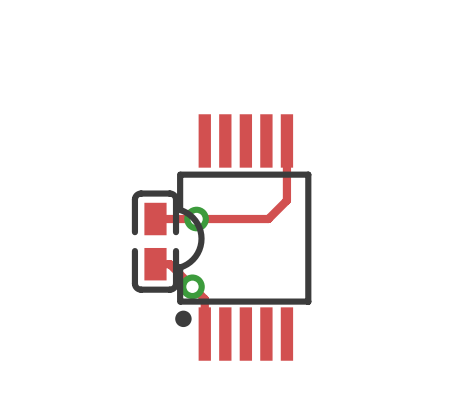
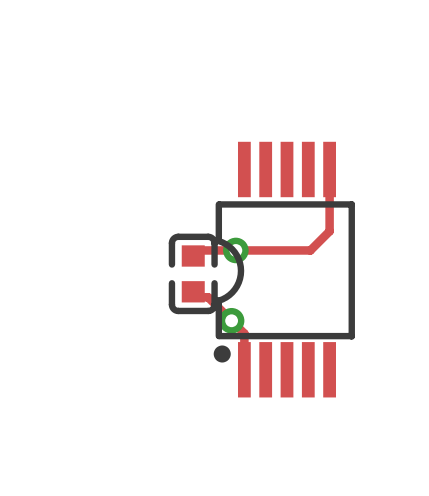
part footprint: [131, 190, 180, 293] -> [168, 233, 218, 315]

